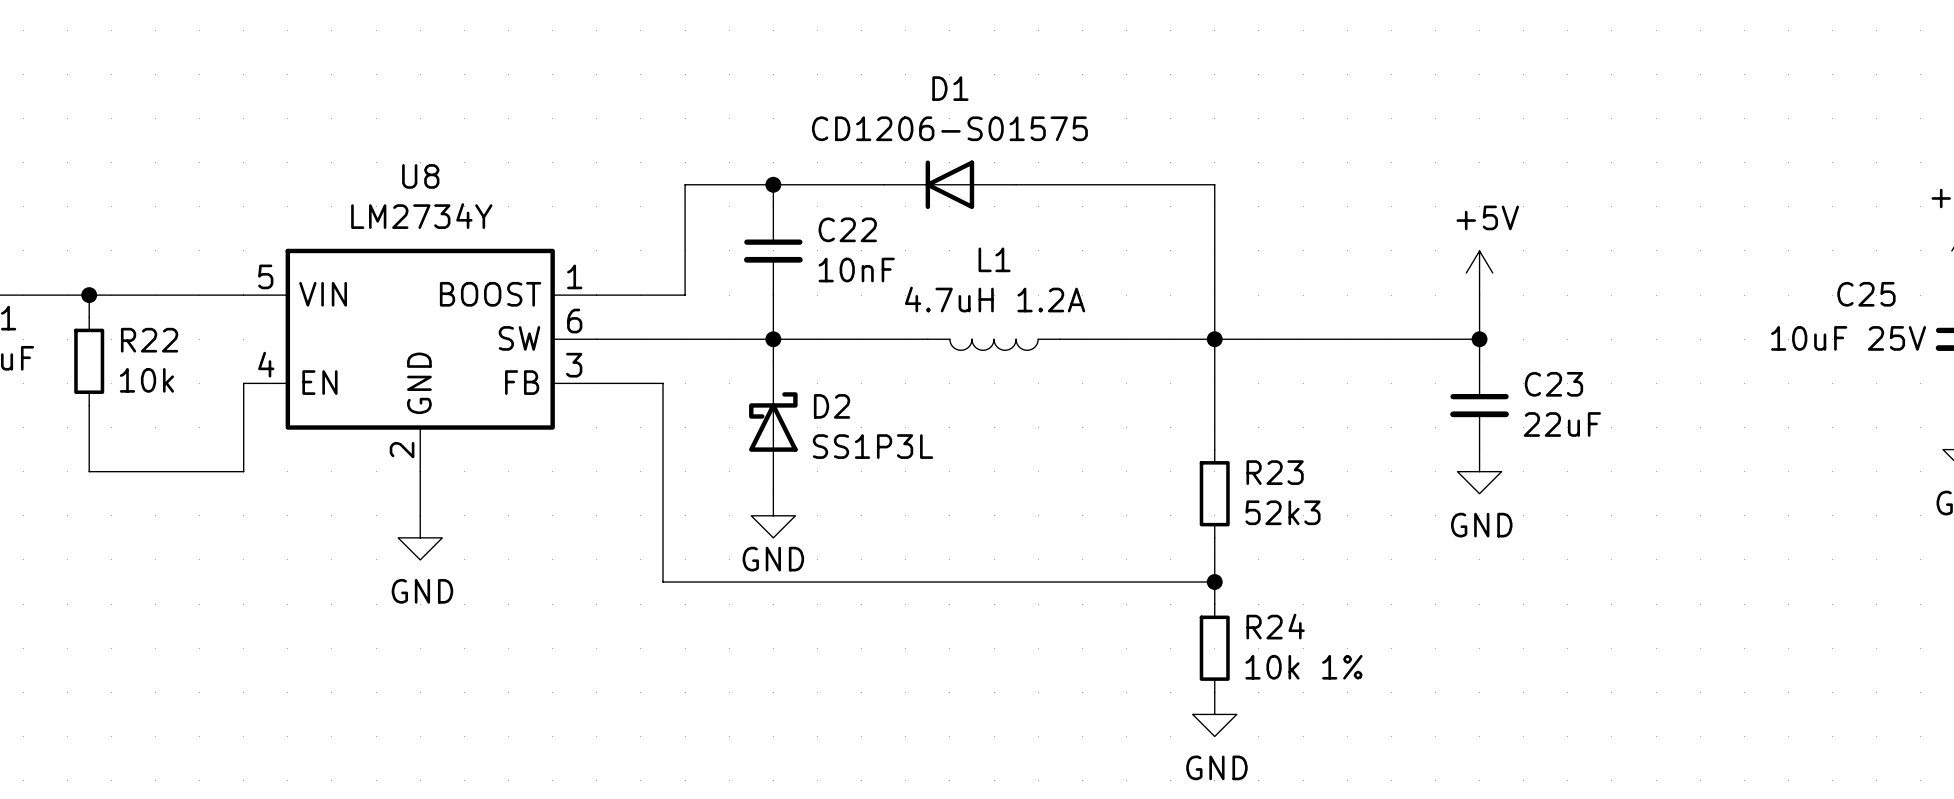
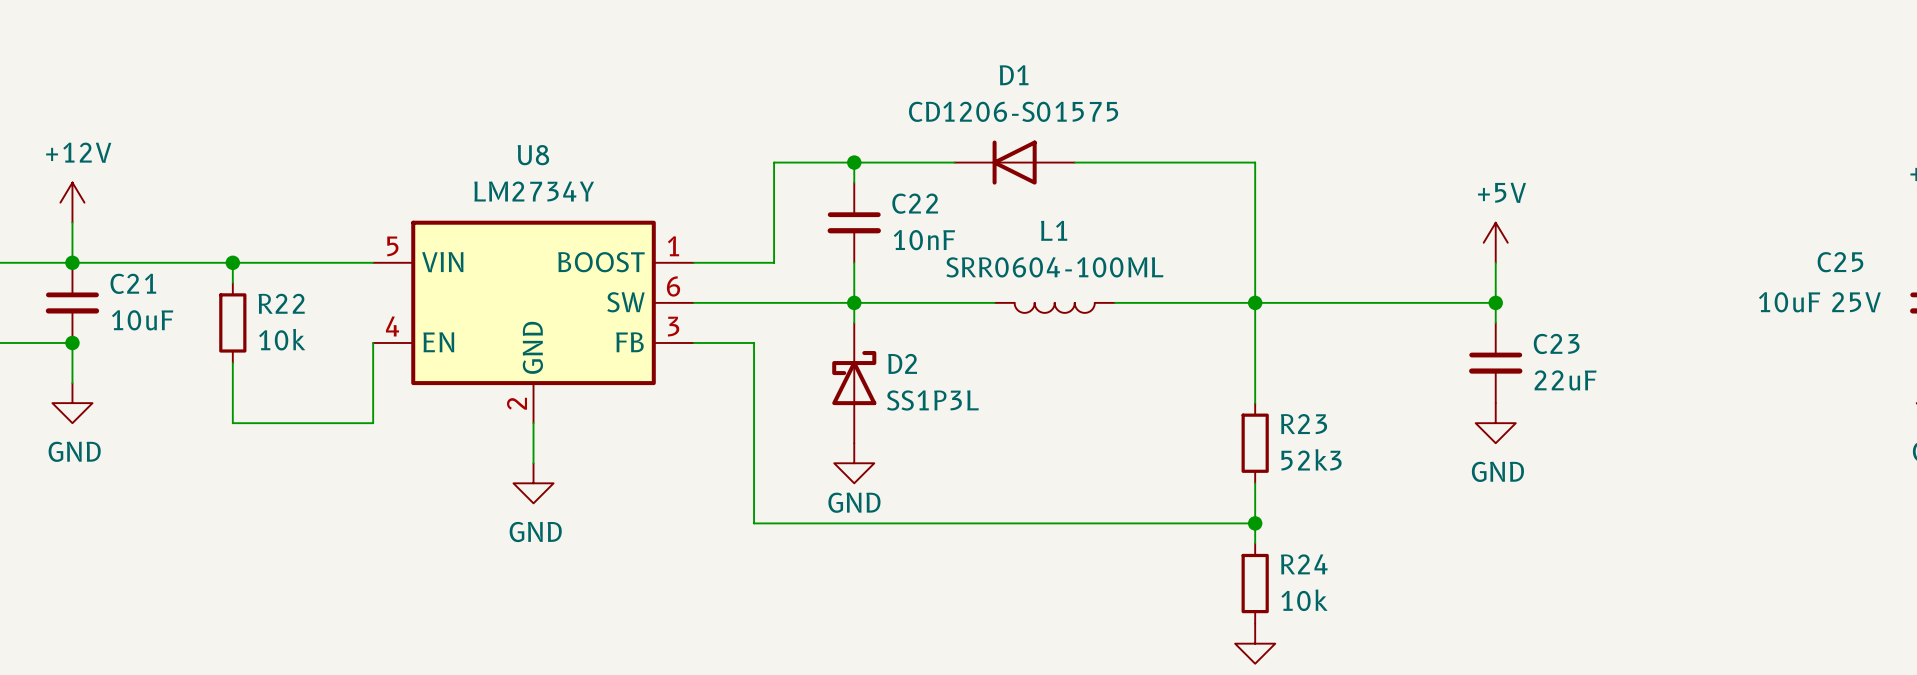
L1 value: 4.7uH 1.2A (995, 299) -> SRR0604-100ML (1054, 267)
R24 value: 10k 1% (1303, 667) -> 10k (1304, 600)

